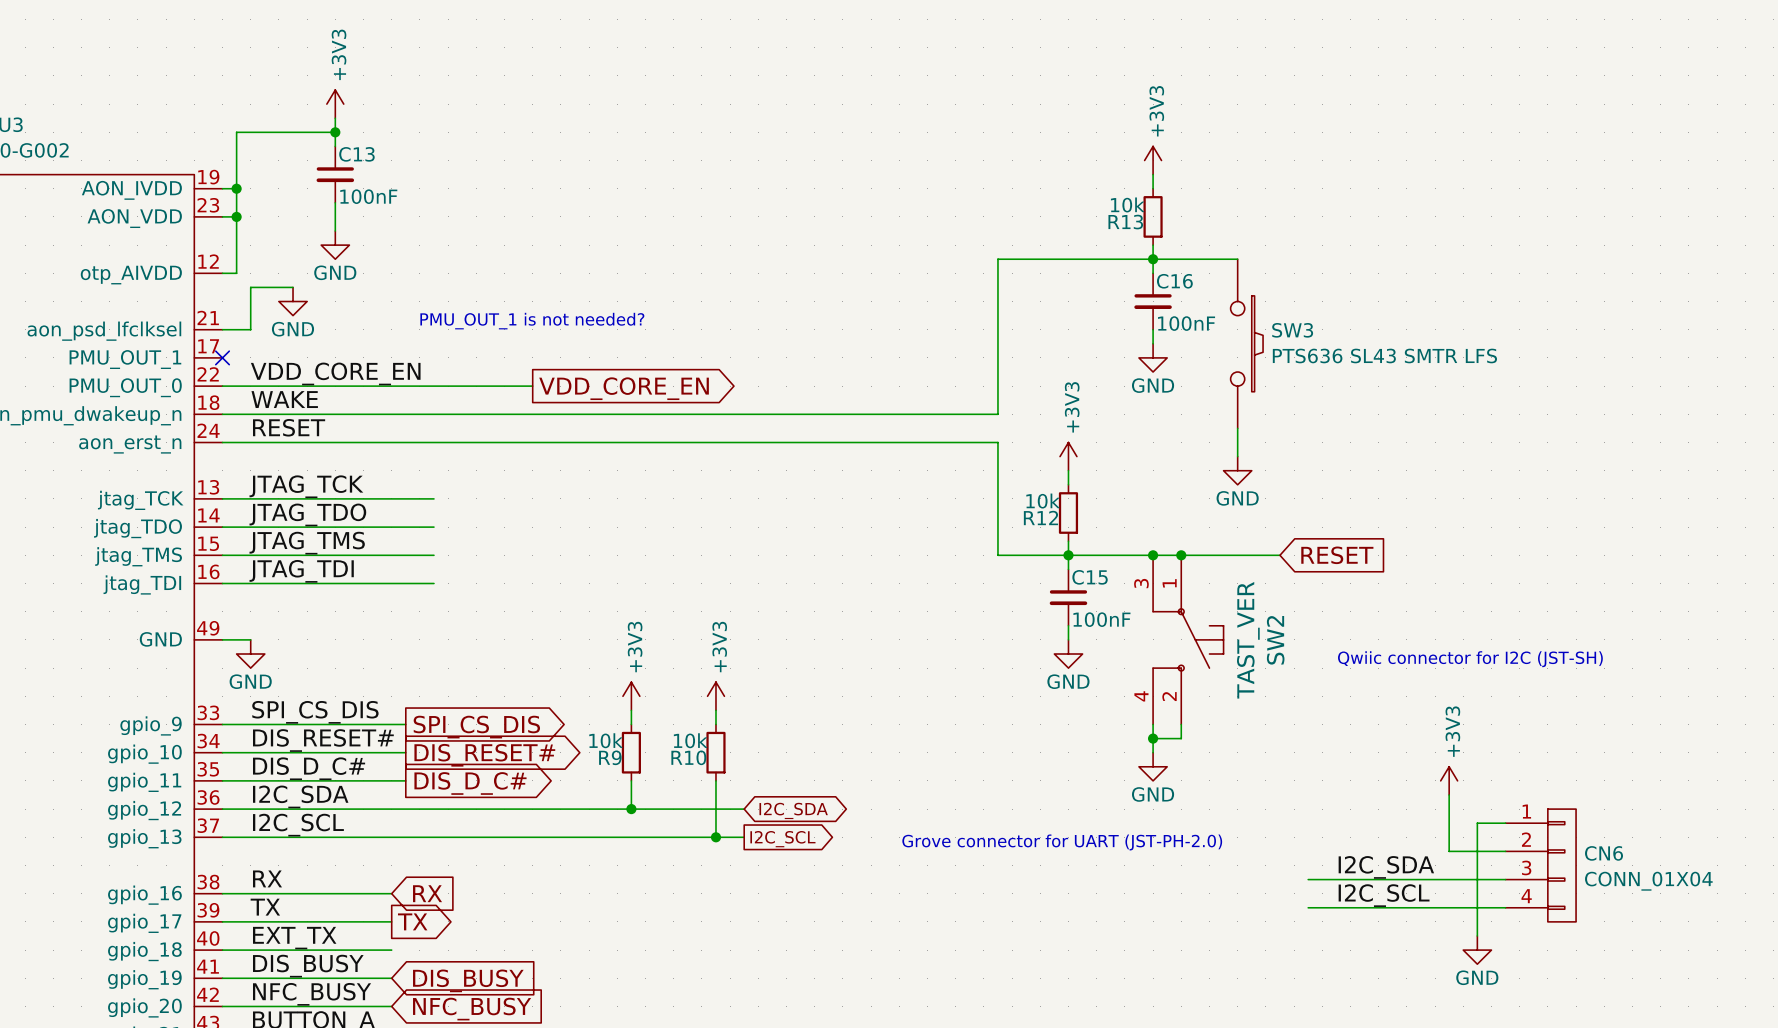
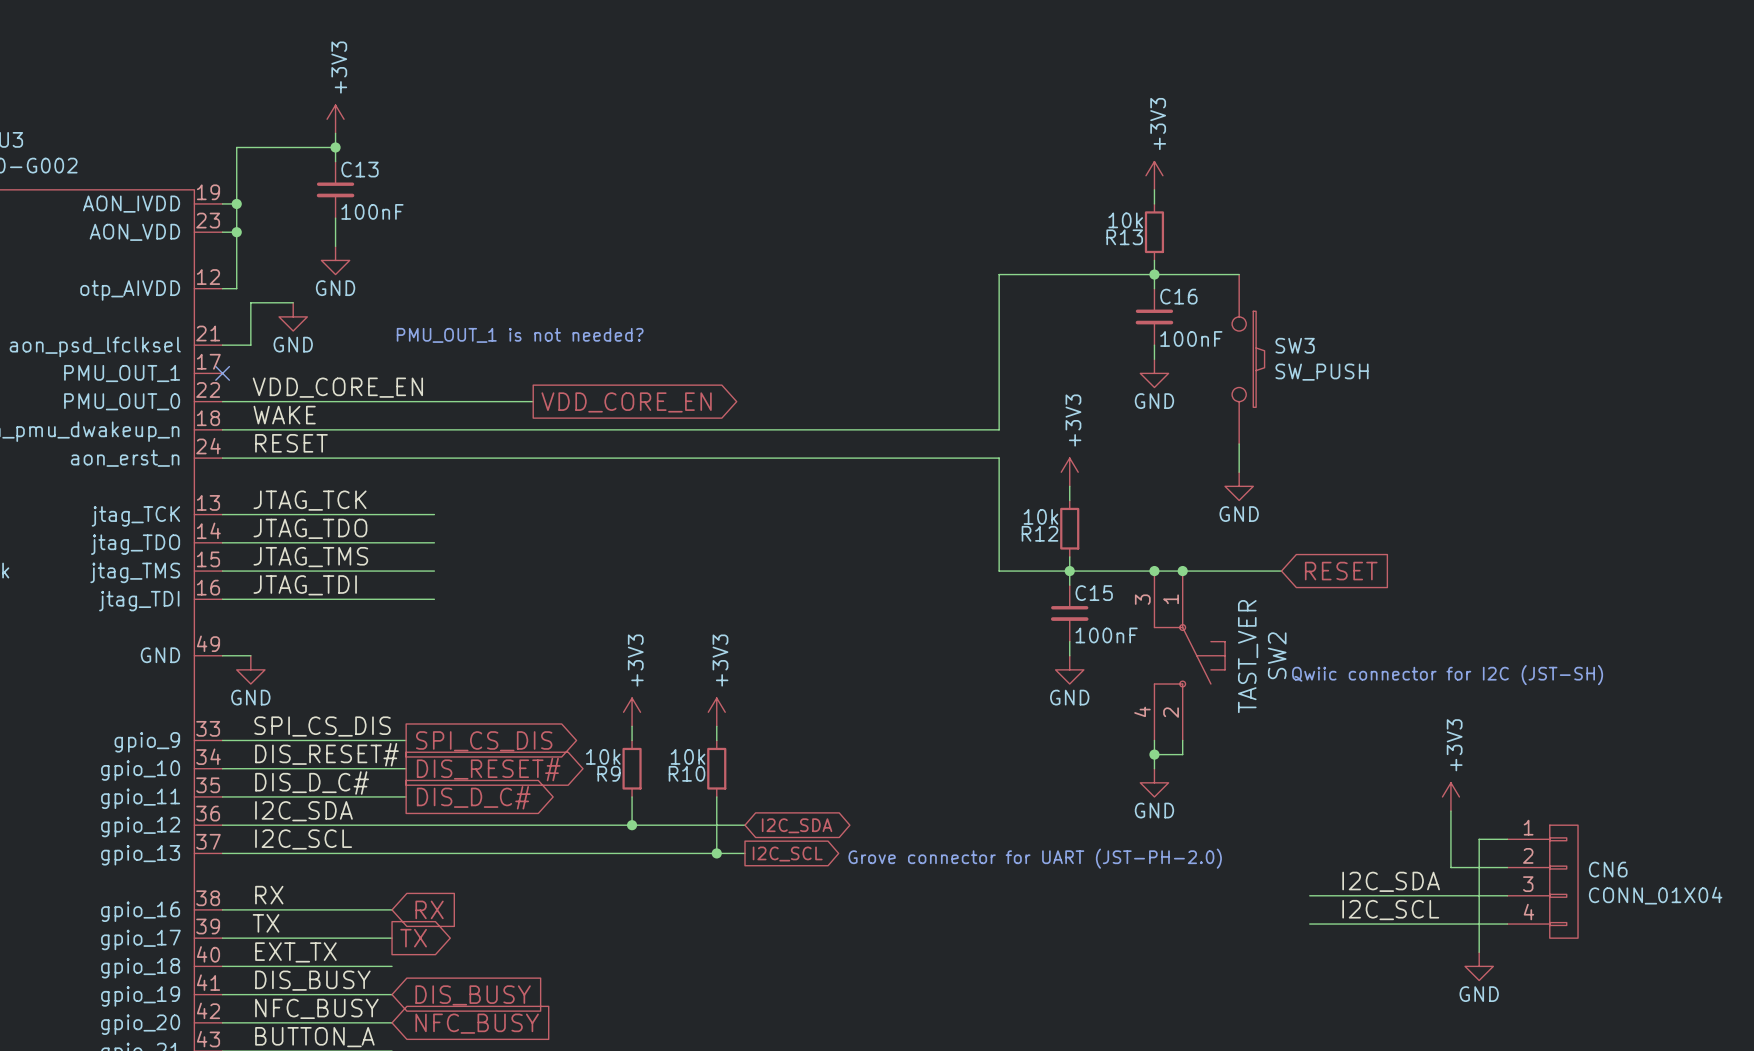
SW3 value: PTS636 SL43 SMTR LFS (1384, 355) -> SW_PUSH (1322, 372)

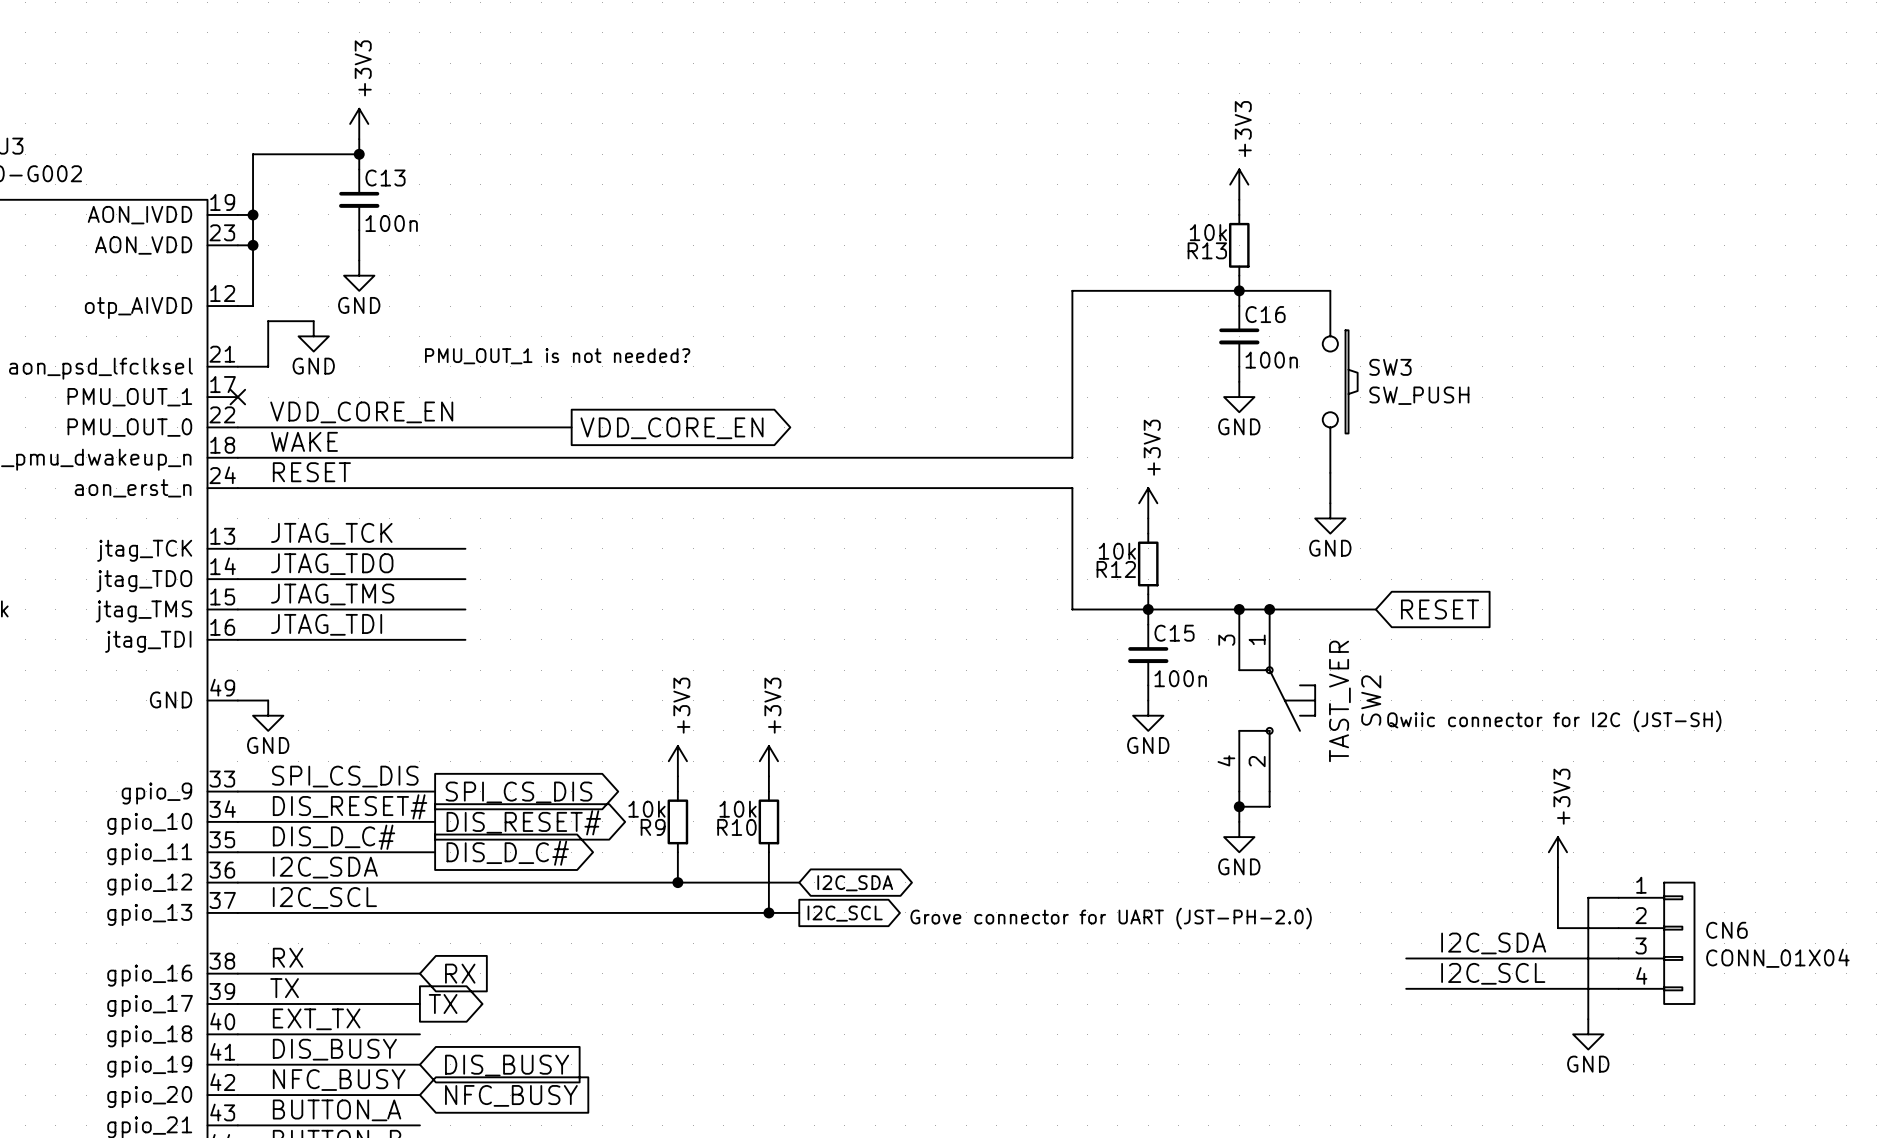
C13 value: 100nF (372, 211) -> 100n (391, 223)
C16 value: 100nF (1191, 338) -> 100n (1271, 360)
C15 value: 100nF (1106, 635) -> 100n (1180, 678)

